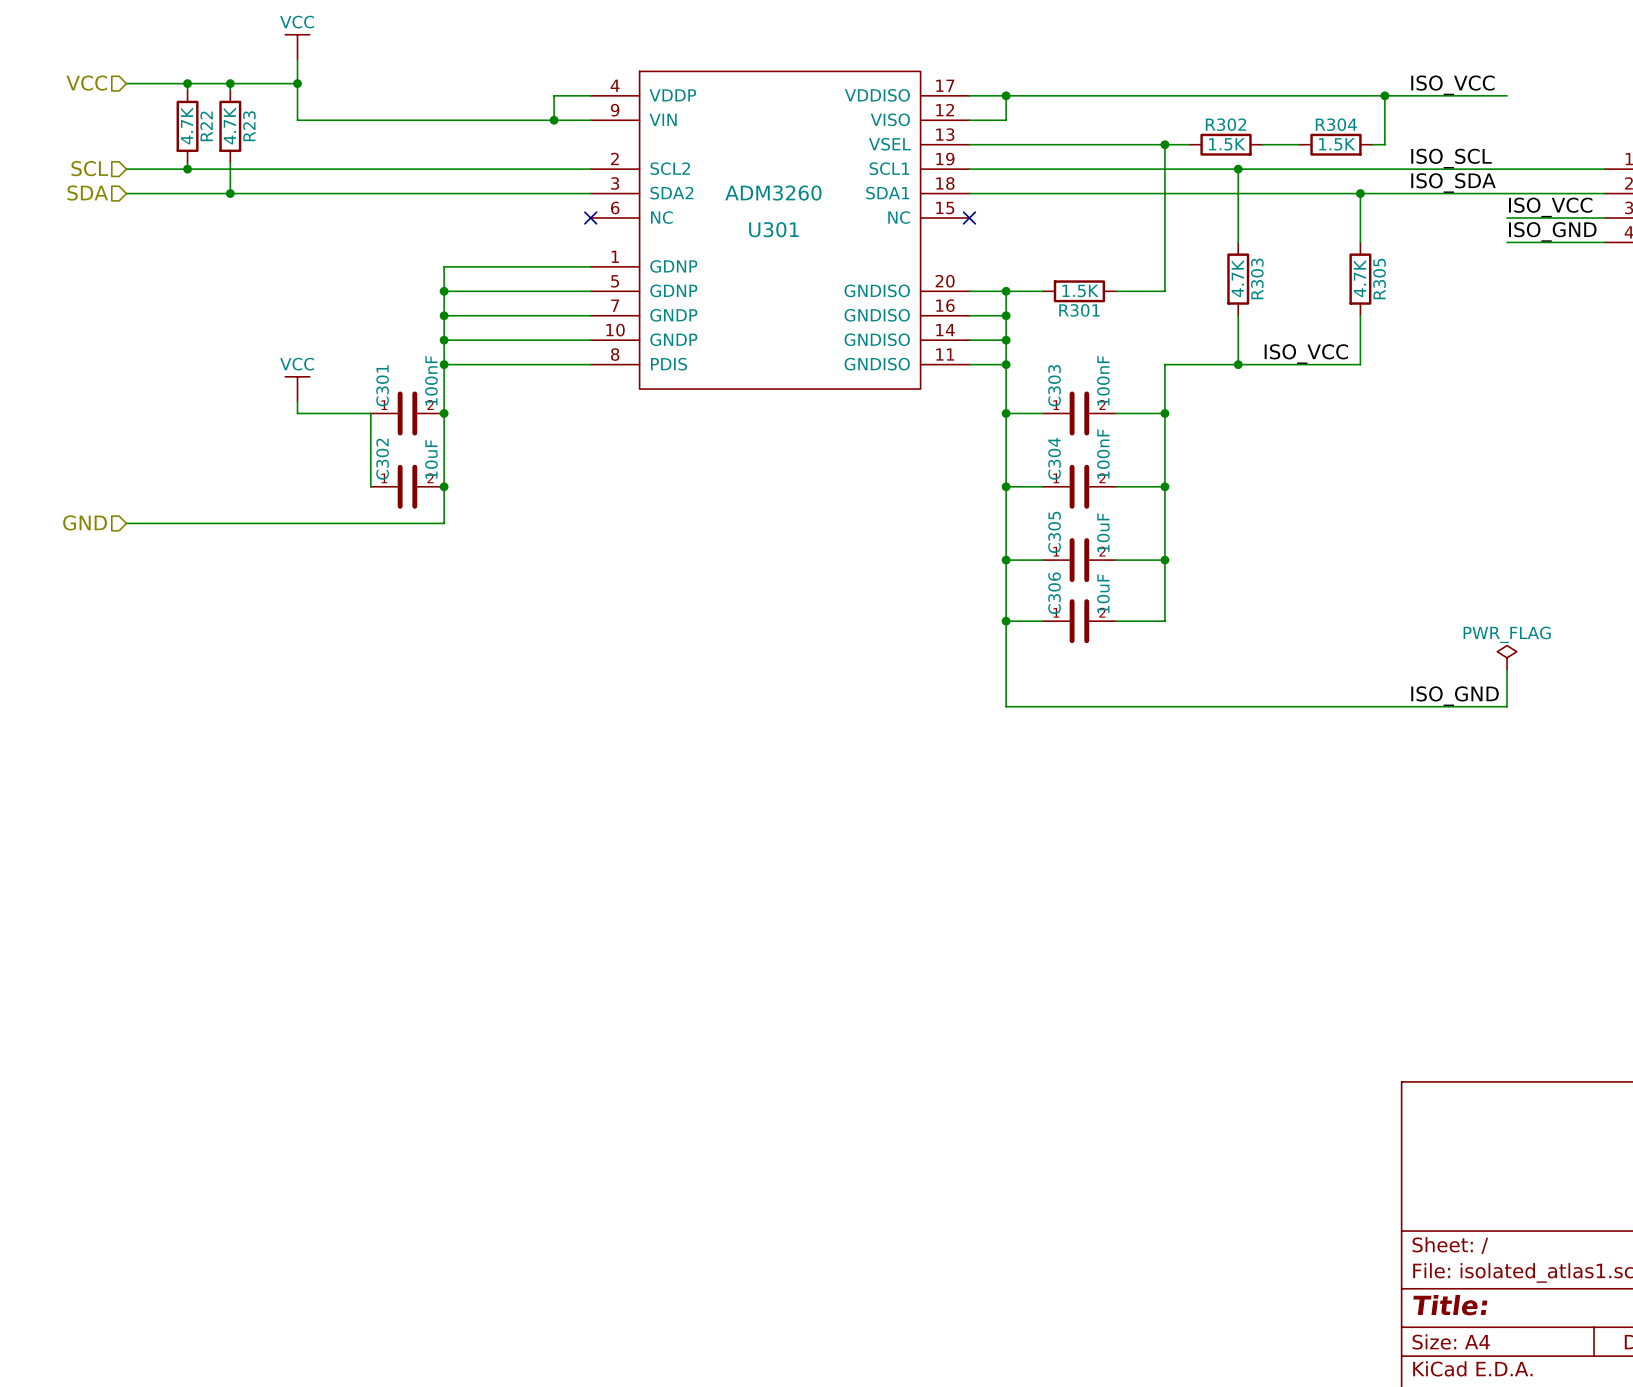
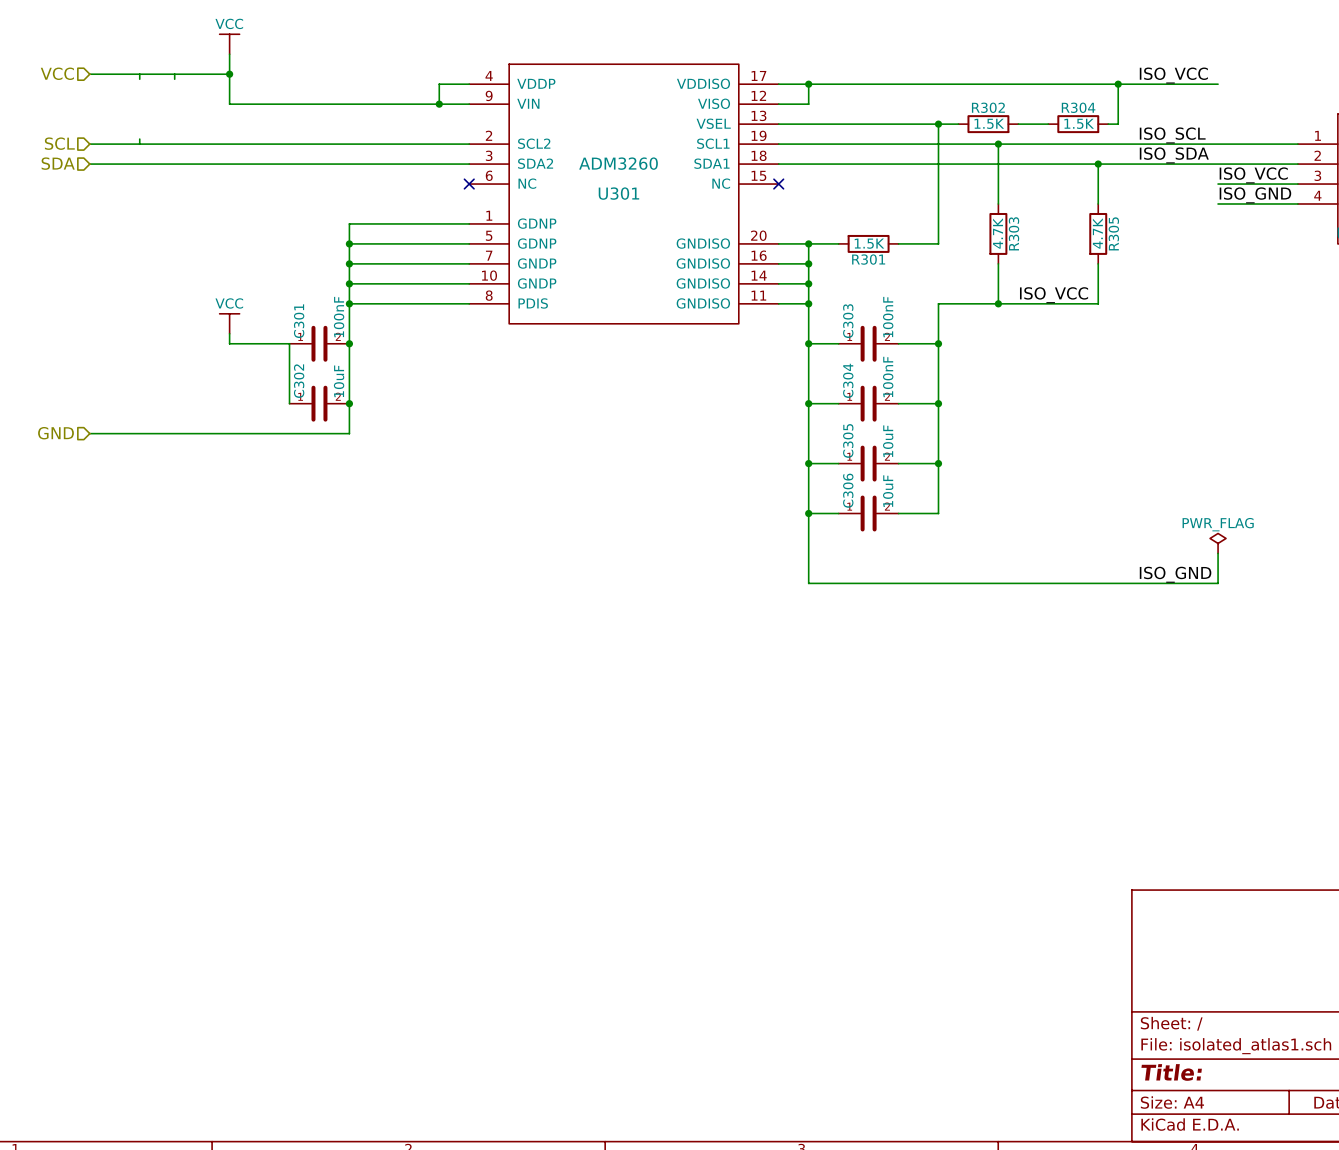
junction: (187, 83) -> none
junction: (230, 83) -> none
R22: 4.7K (187, 126) -> none
R23: 4.7K (230, 126) -> none
wire: (230, 163) (230, 193) -> none
junction: (187, 169) -> none
junction: (230, 193) -> none

